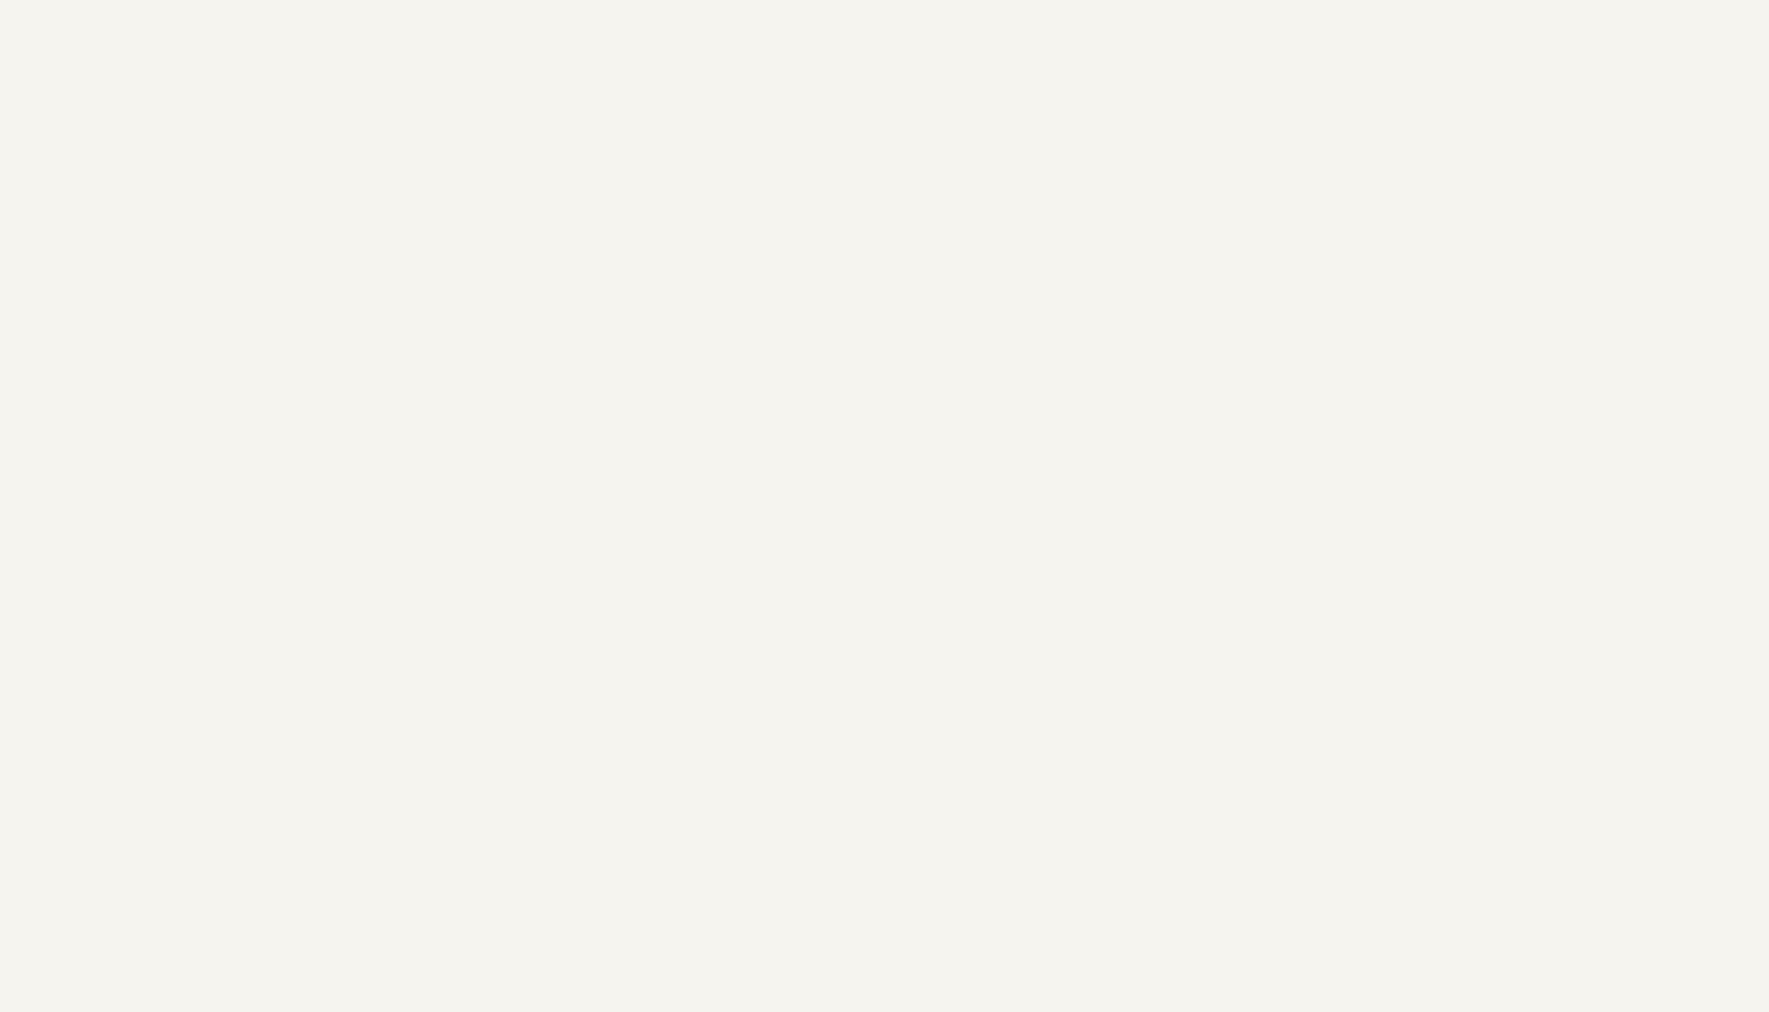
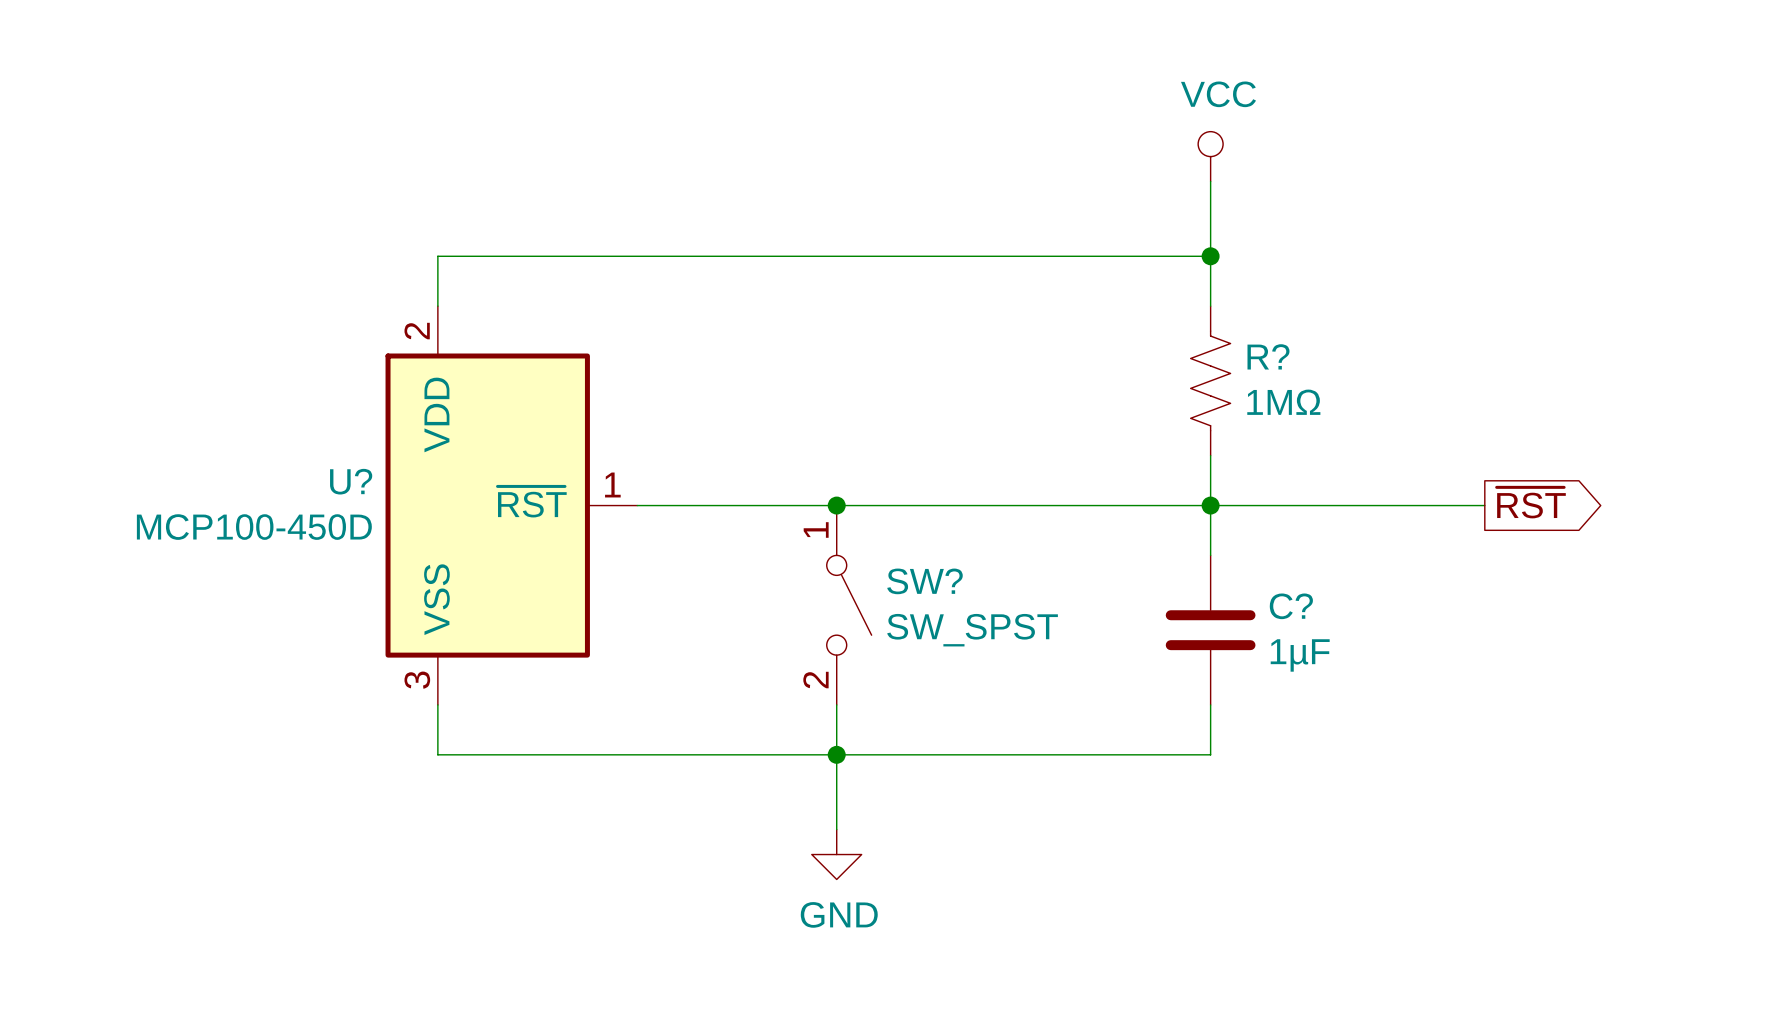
power symbol: none -> VCC (1210, 156)
wire: none -> (1210, 181) (1210, 306)
wire: none -> (1210, 256) (437, 256) (437, 306)
junction: none -> (1210, 256)
R?: none -> 1MΩ (1210, 380)
wire: none -> (1210, 455) (1210, 555)
global label: none -> ~{RST} (1531, 502)
U?: none -> MCP100-450D (511, 505)
wire: none -> (637, 505) (1484, 505)
junction: none -> (836, 505)
junction: none -> (1210, 505)
SW?: none -> SW_SPST (849, 605)
C?: none -> 1µF (1210, 630)
wire: none -> (437, 704) (437, 754) (1210, 754) (1210, 704)
wire: none -> (836, 704) (836, 829)
junction: none -> (836, 754)
power symbol: none -> GND (836, 854)

